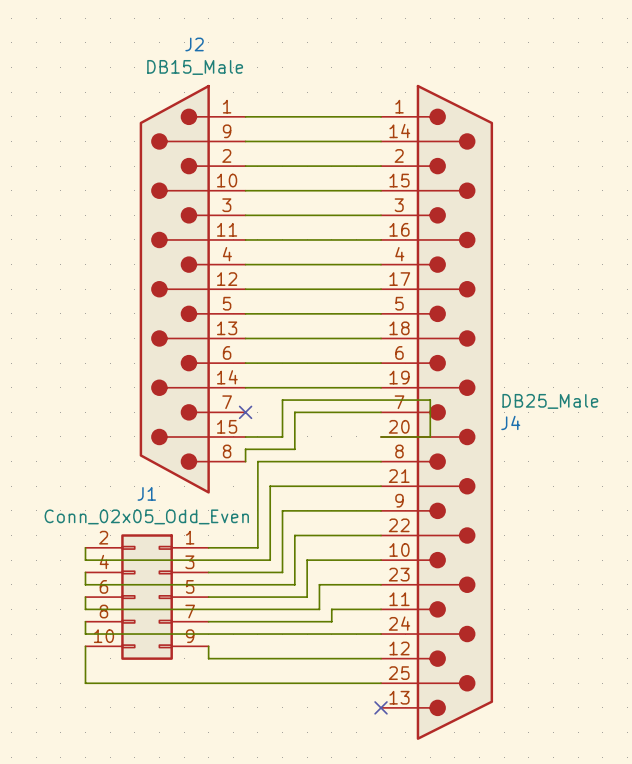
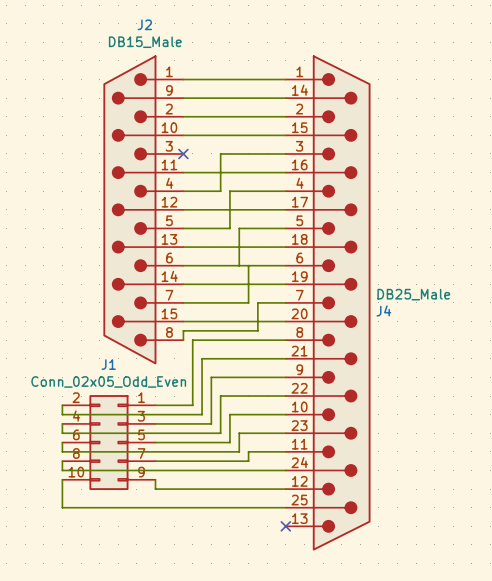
wire: (245, 215) (294, 215) -> (220, 191) (220, 153)
no-connect mark: none -> (183, 153)
wire: (294, 264) (307, 264) -> (229, 228) (229, 191)
wire: (307, 313) (319, 313) -> (239, 265) (239, 228)
wire: none -> (183, 302) (220, 302)
no-connect mark: (245, 412) -> none
wire: (294, 412) (294, 449) -> (257, 302) (257, 330) (220, 330)
wire: (331, 412) (344, 412) -> (248, 302) (248, 265)
wire: (282, 436) (282, 400) (430, 400) (430, 436) (381, 436) -> (211, 321) (285, 321)

